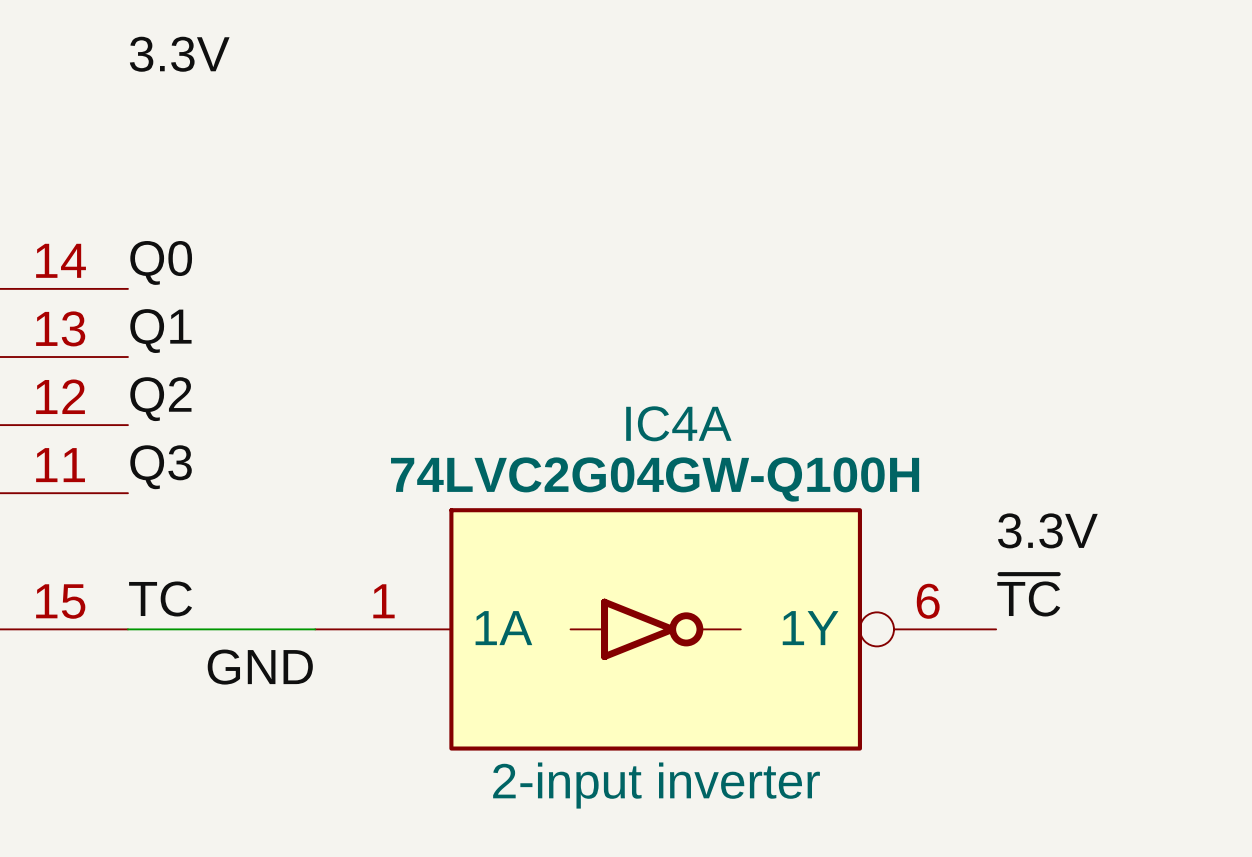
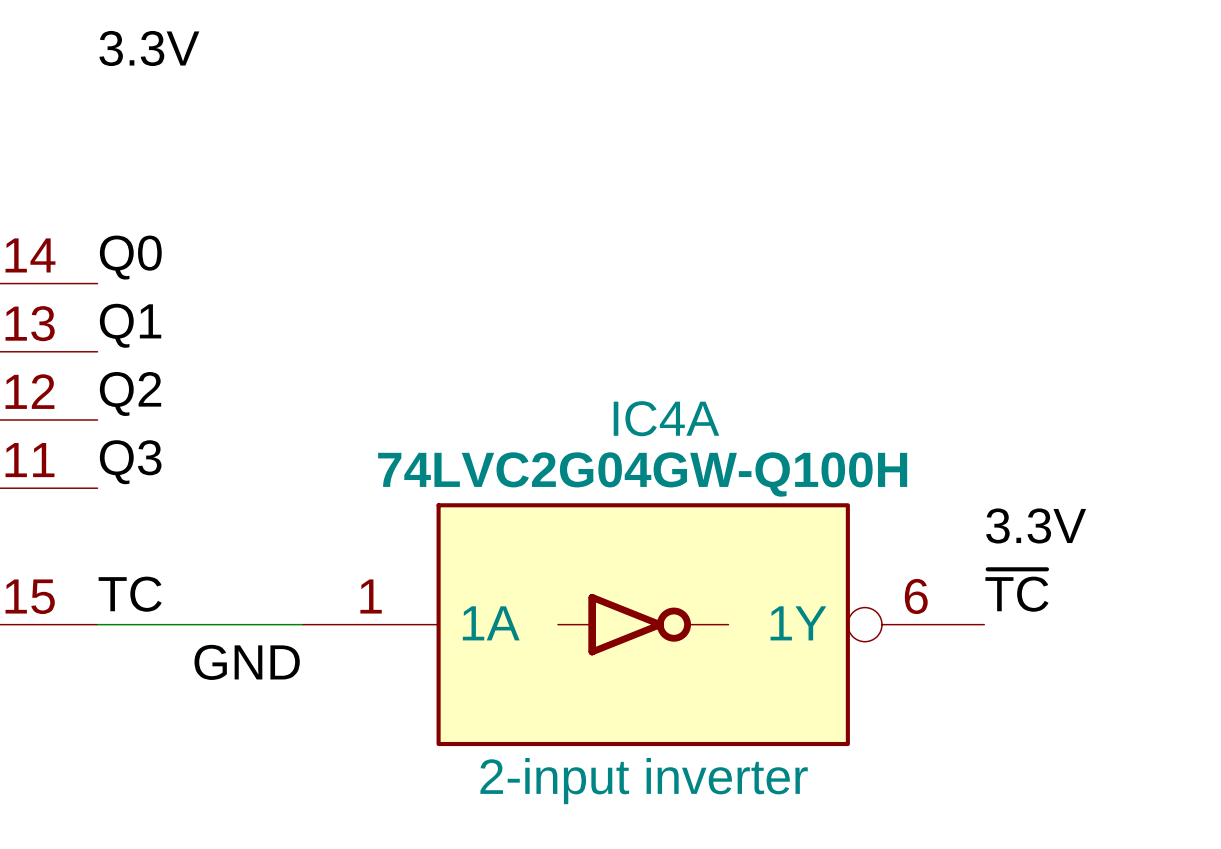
label position: 3.3V (1047, 530) -> 3.3V (1036, 525)
label position: ~{TC} (1028, 595) -> ~{TC} (1016, 590)
IC4A position: (655, 629) -> (643, 624)
label position: GND (260, 667) -> GND (247, 662)

